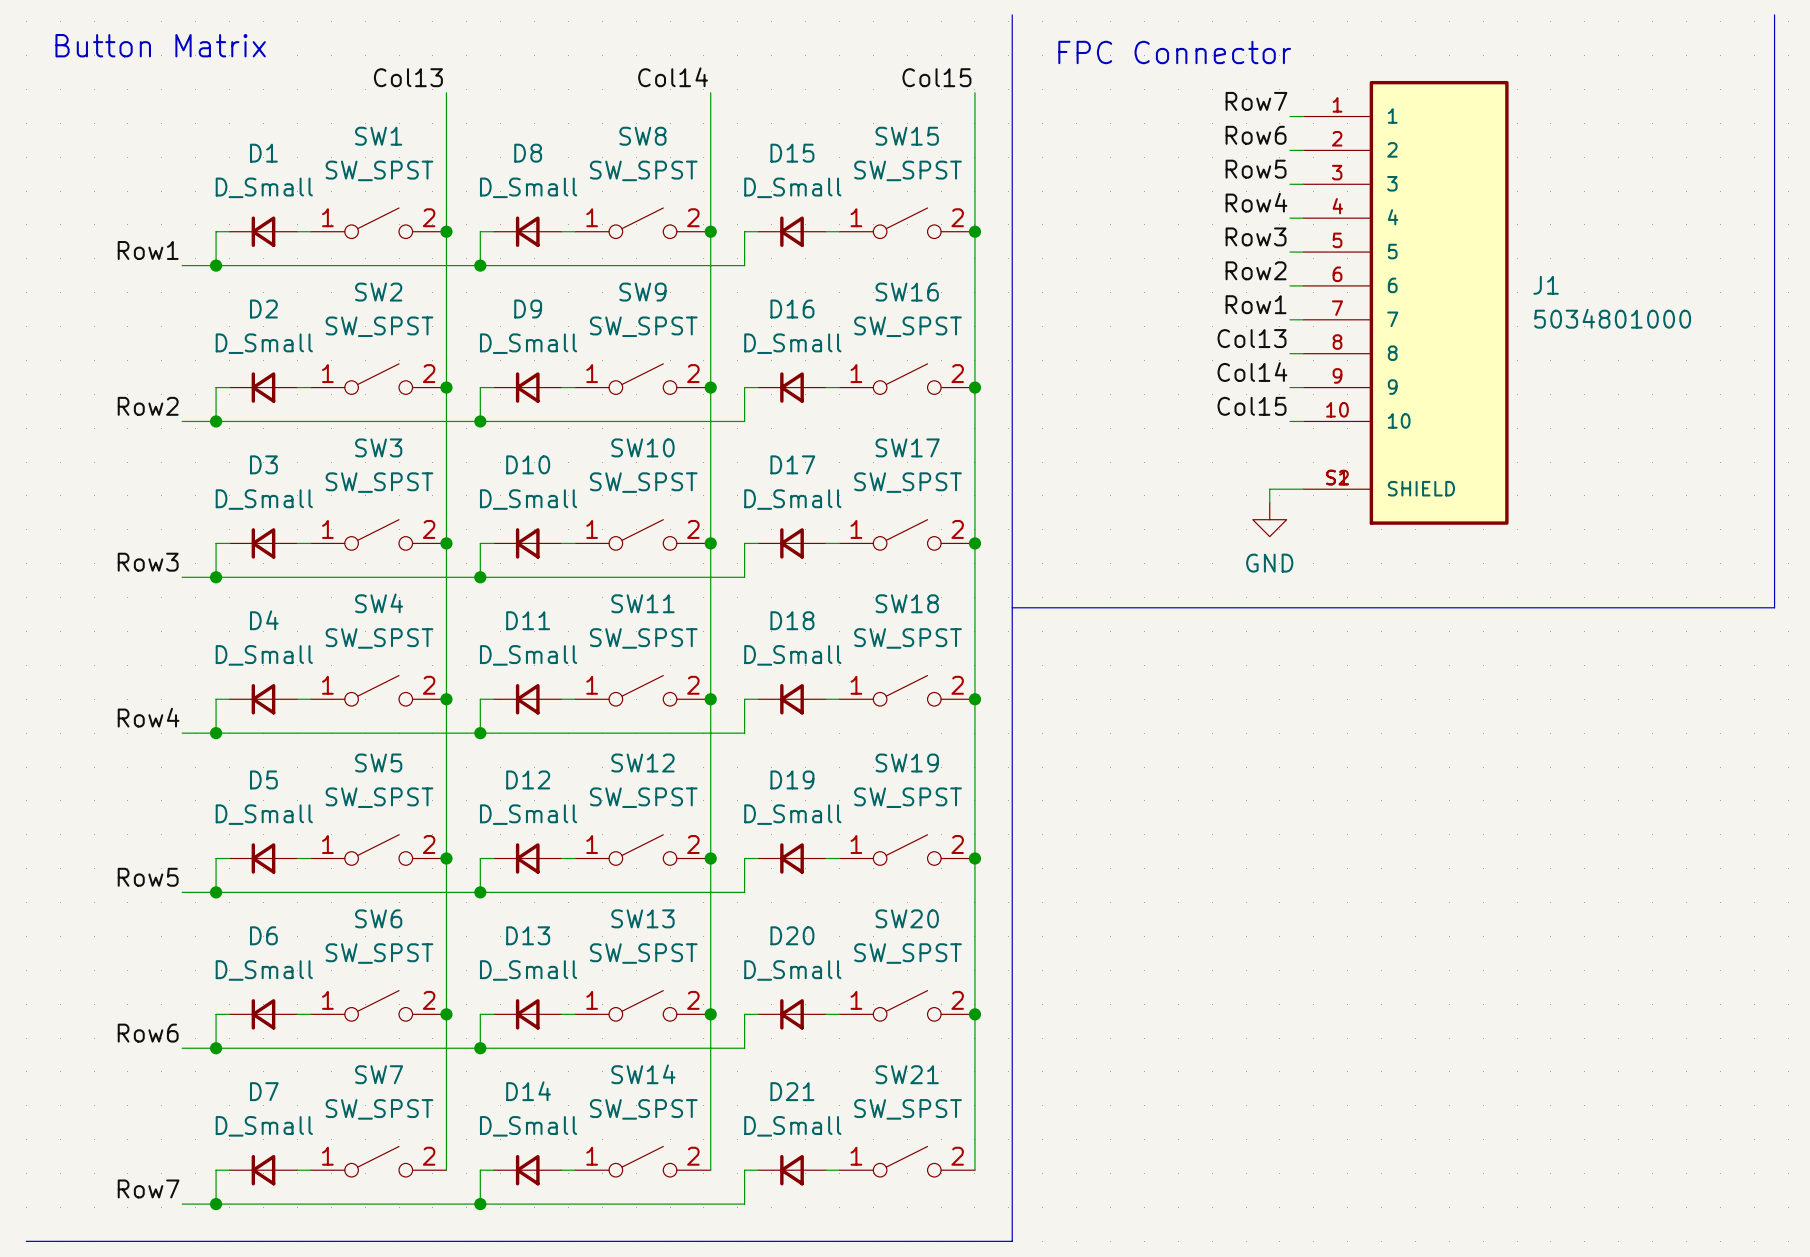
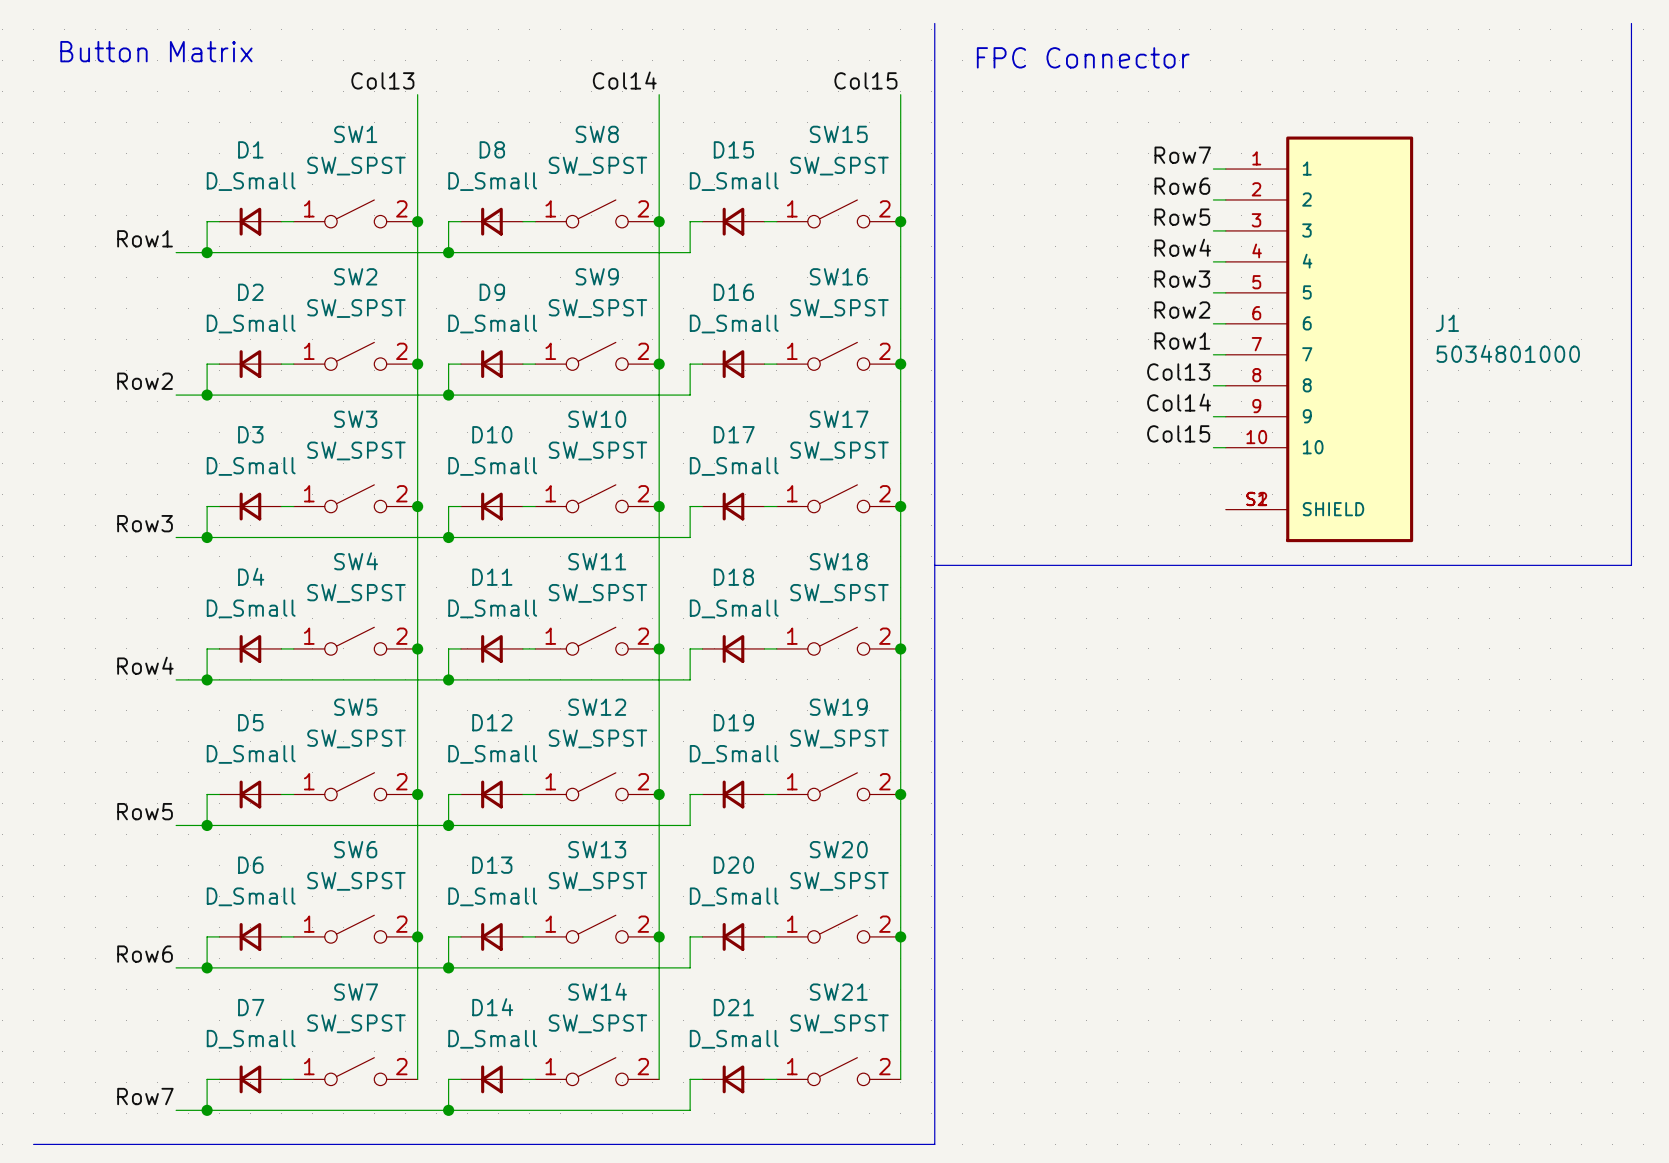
label position: Row7 (1256, 101) -> Row7 (1182, 155)
wire: (1290, 116) (1303, 116) -> (1213, 169) (1225, 169)
label position: Row6 (1256, 135) -> Row6 (1182, 186)
wire: (1290, 150) (1303, 150) -> (1213, 199) (1225, 199)
label position: Row5 (1256, 169) -> Row5 (1182, 217)
wire: (1290, 184) (1303, 184) -> (1213, 230) (1225, 230)
label position: Row4 (1256, 202) -> Row4 (1182, 247)
wire: (1290, 218) (1303, 218) -> (1213, 261) (1225, 261)
label position: Row3 (1256, 236) -> Row3 (1182, 279)
wire: (1290, 252) (1303, 252) -> (1213, 292) (1225, 292)
label position: Row2 (1256, 270) -> Row2 (1182, 310)
wire: (1290, 285) (1303, 285) -> (1213, 323) (1225, 323)
J1 position: (1406, 302) -> (1319, 339)
label position: Row1 (1256, 304) -> Row1 (1182, 340)
wire: (1290, 319) (1303, 319) -> (1213, 354) (1225, 354)
label position: Col13 (1252, 338) -> Col13 (1178, 371)
wire: (1290, 353) (1303, 353) -> (1213, 385) (1225, 385)
label position: Col14 (1252, 372) -> Col14 (1179, 402)
wire: (1290, 387) (1303, 387) -> (1213, 416) (1225, 416)
label position: Col15 (1252, 406) -> Col15 (1178, 433)
wire: (1290, 421) (1303, 421) -> (1213, 447) (1225, 447)
wire: (1303, 489) (1269, 489) (1269, 502) -> none
power symbol: GND (1269, 519) -> none

